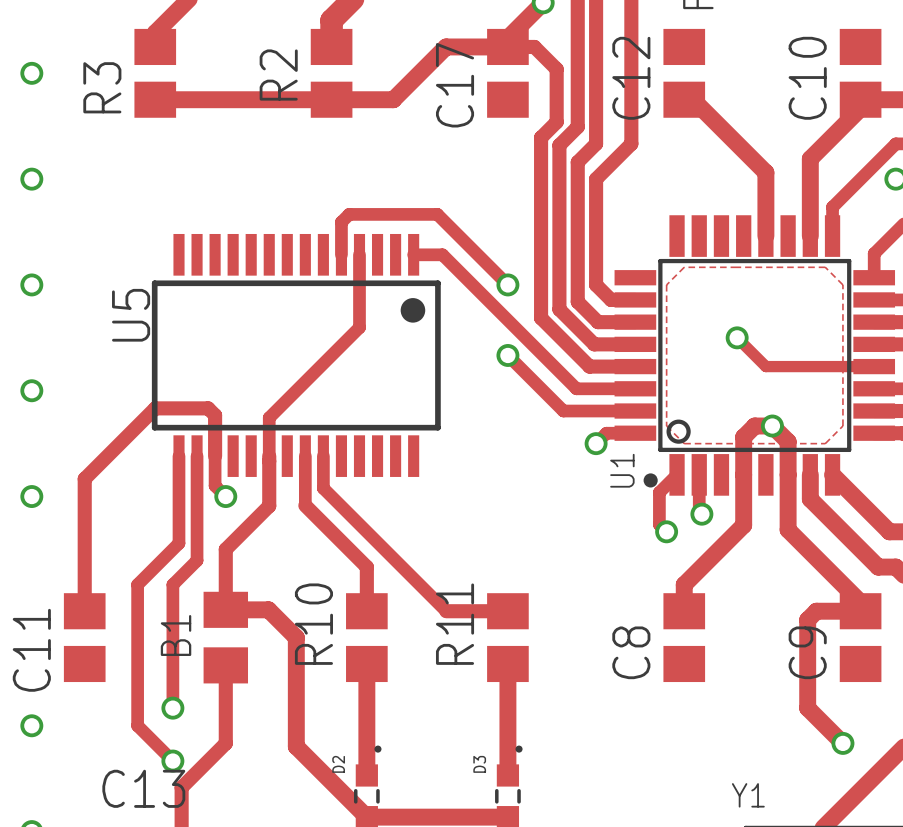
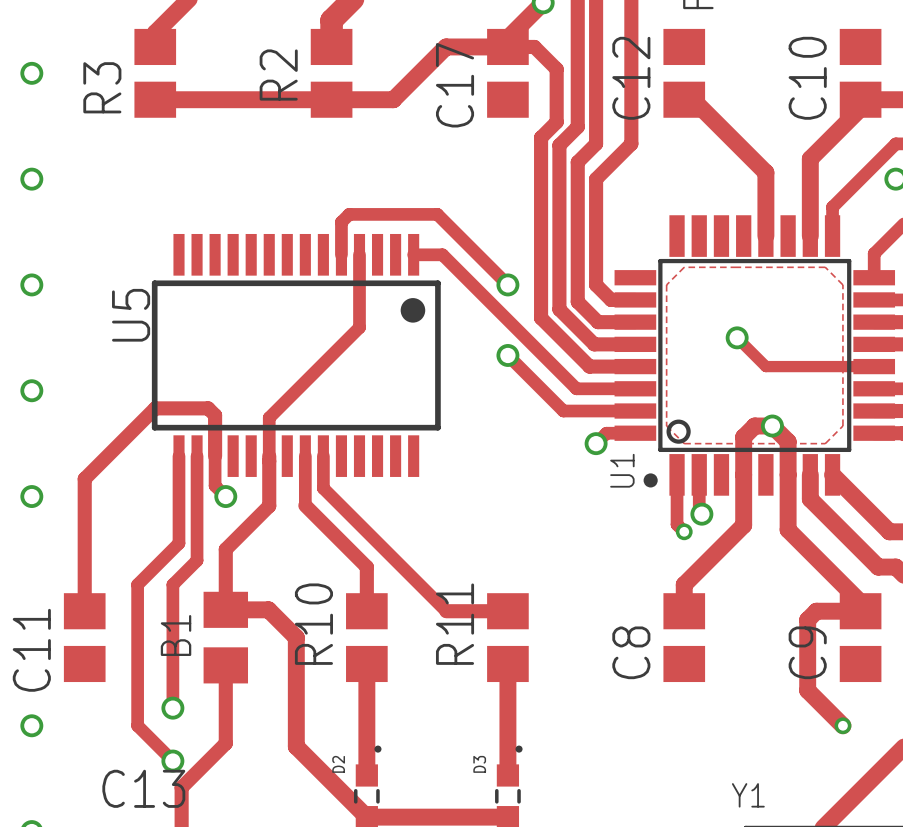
track: (677, 474) (659, 492) (659, 524) (666, 531) -> (677, 474) (677, 524) (684, 531)
via position: (666, 531) -> (684, 531)
track: (807, 690) (807, 708) (842, 743) -> (807, 690) (842, 725)
via position: (842, 743) -> (842, 725)

